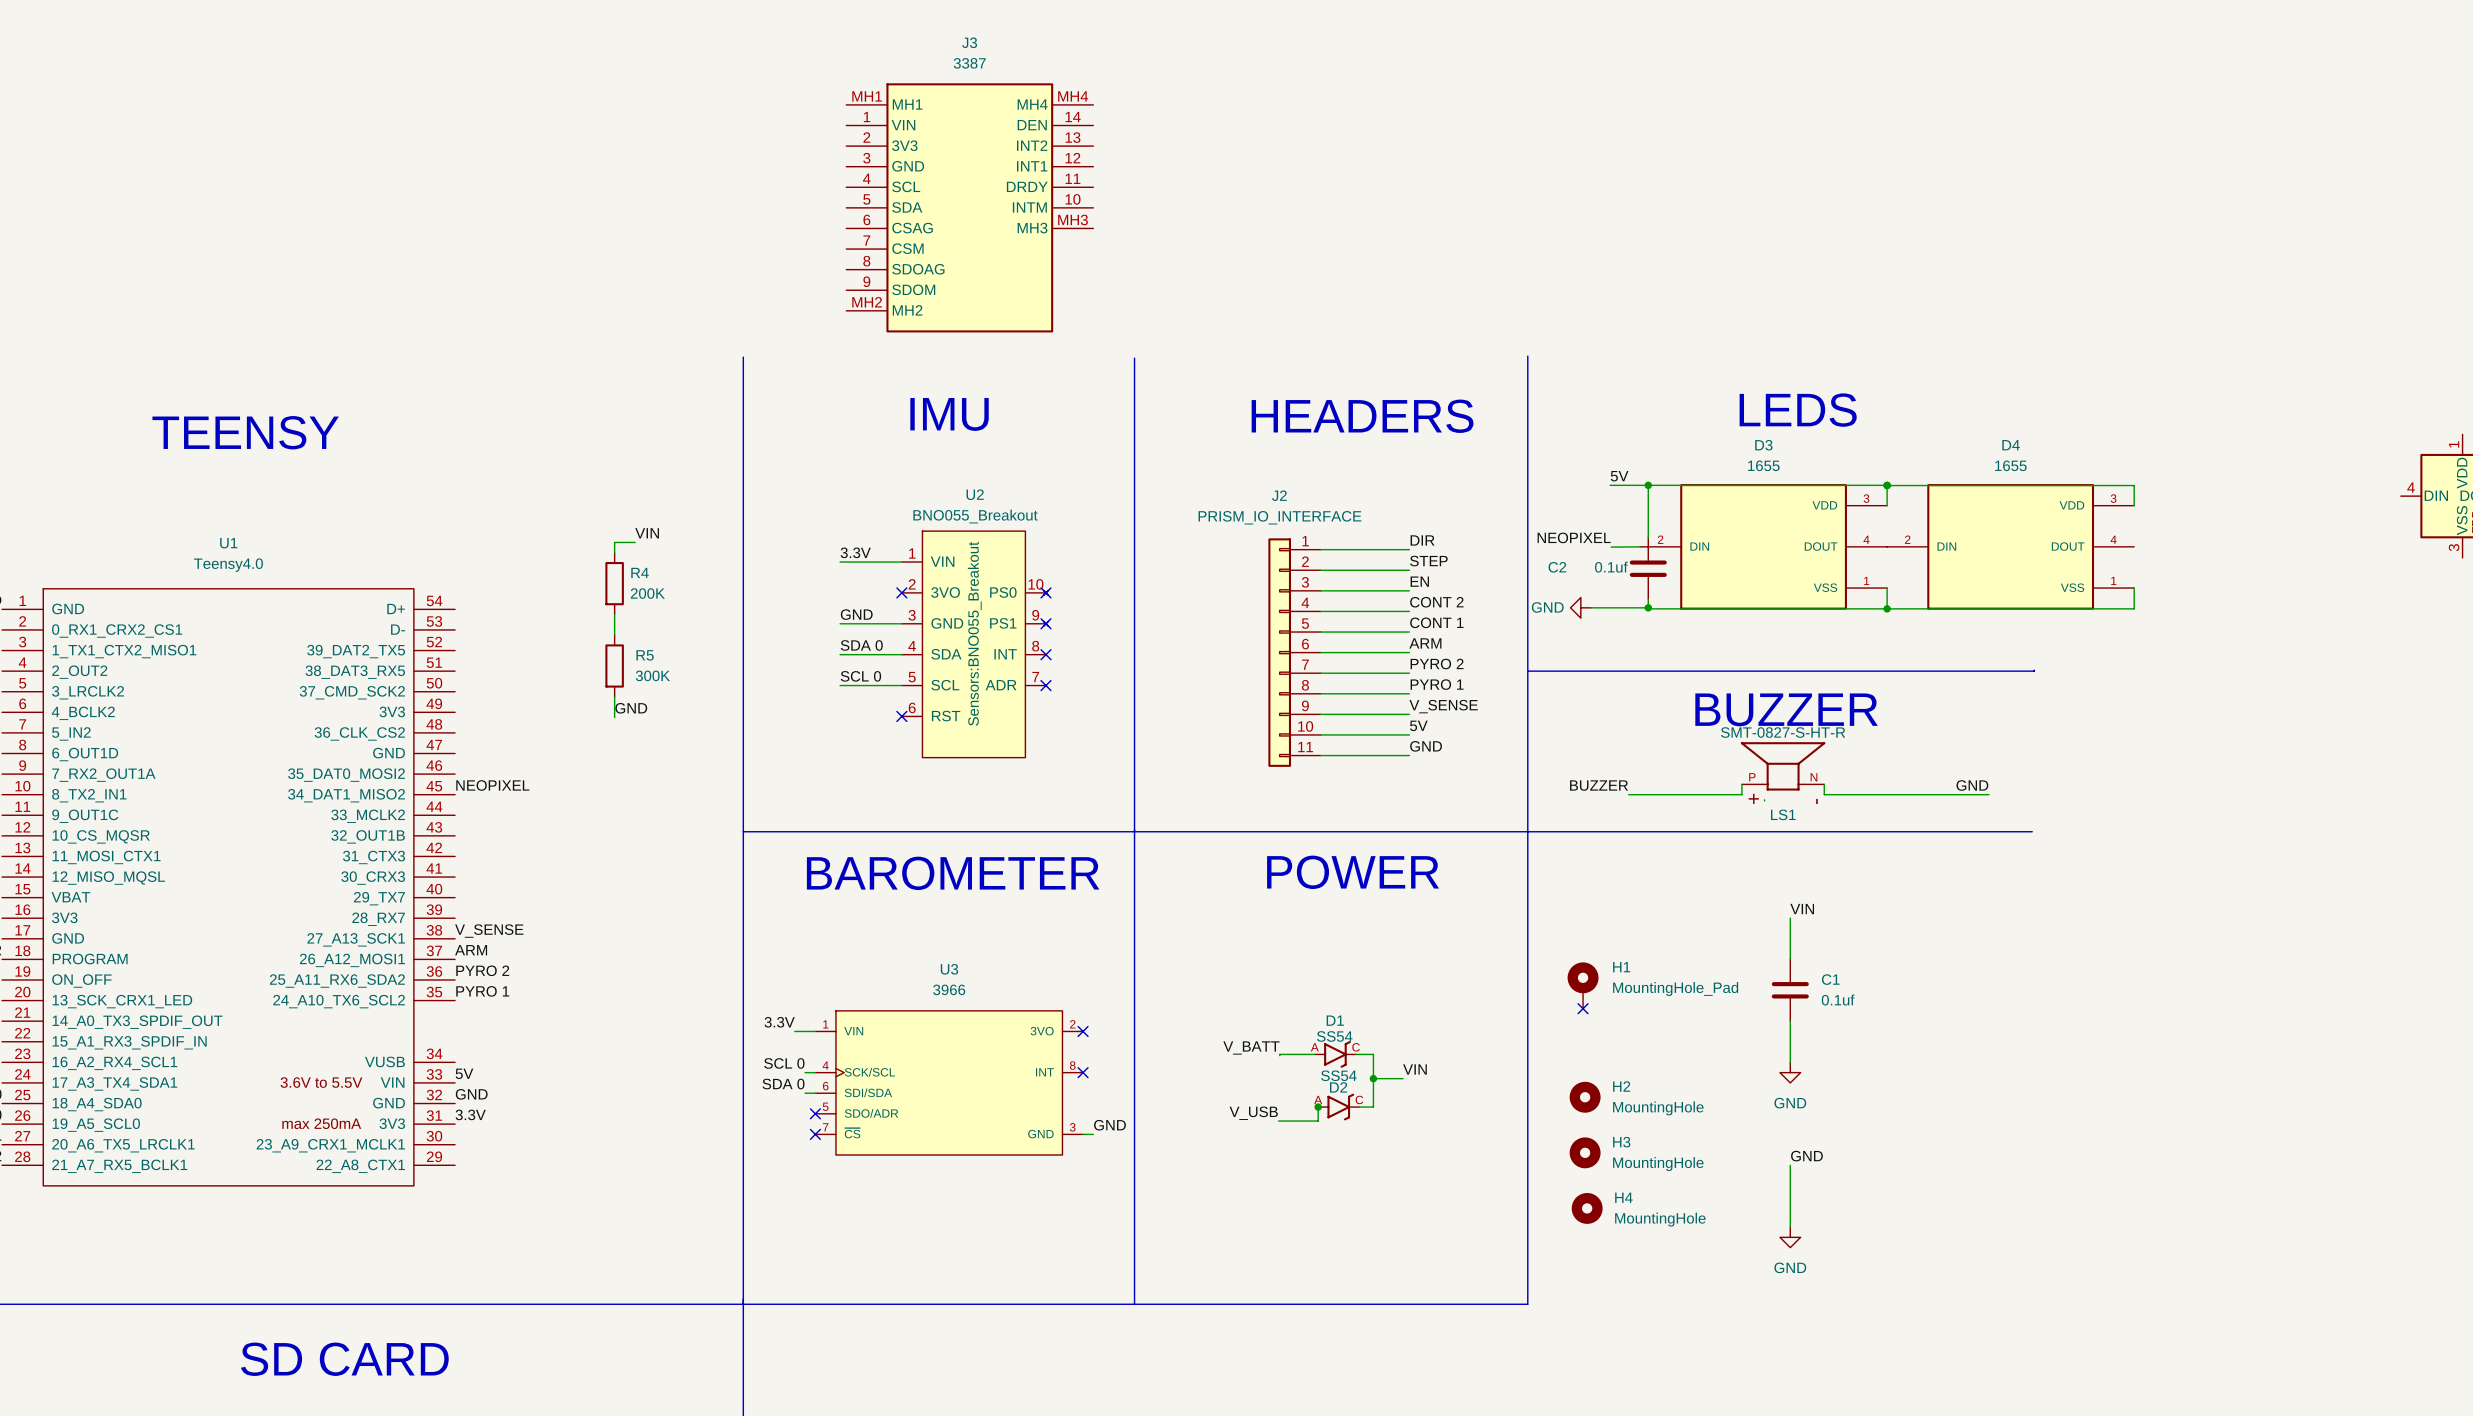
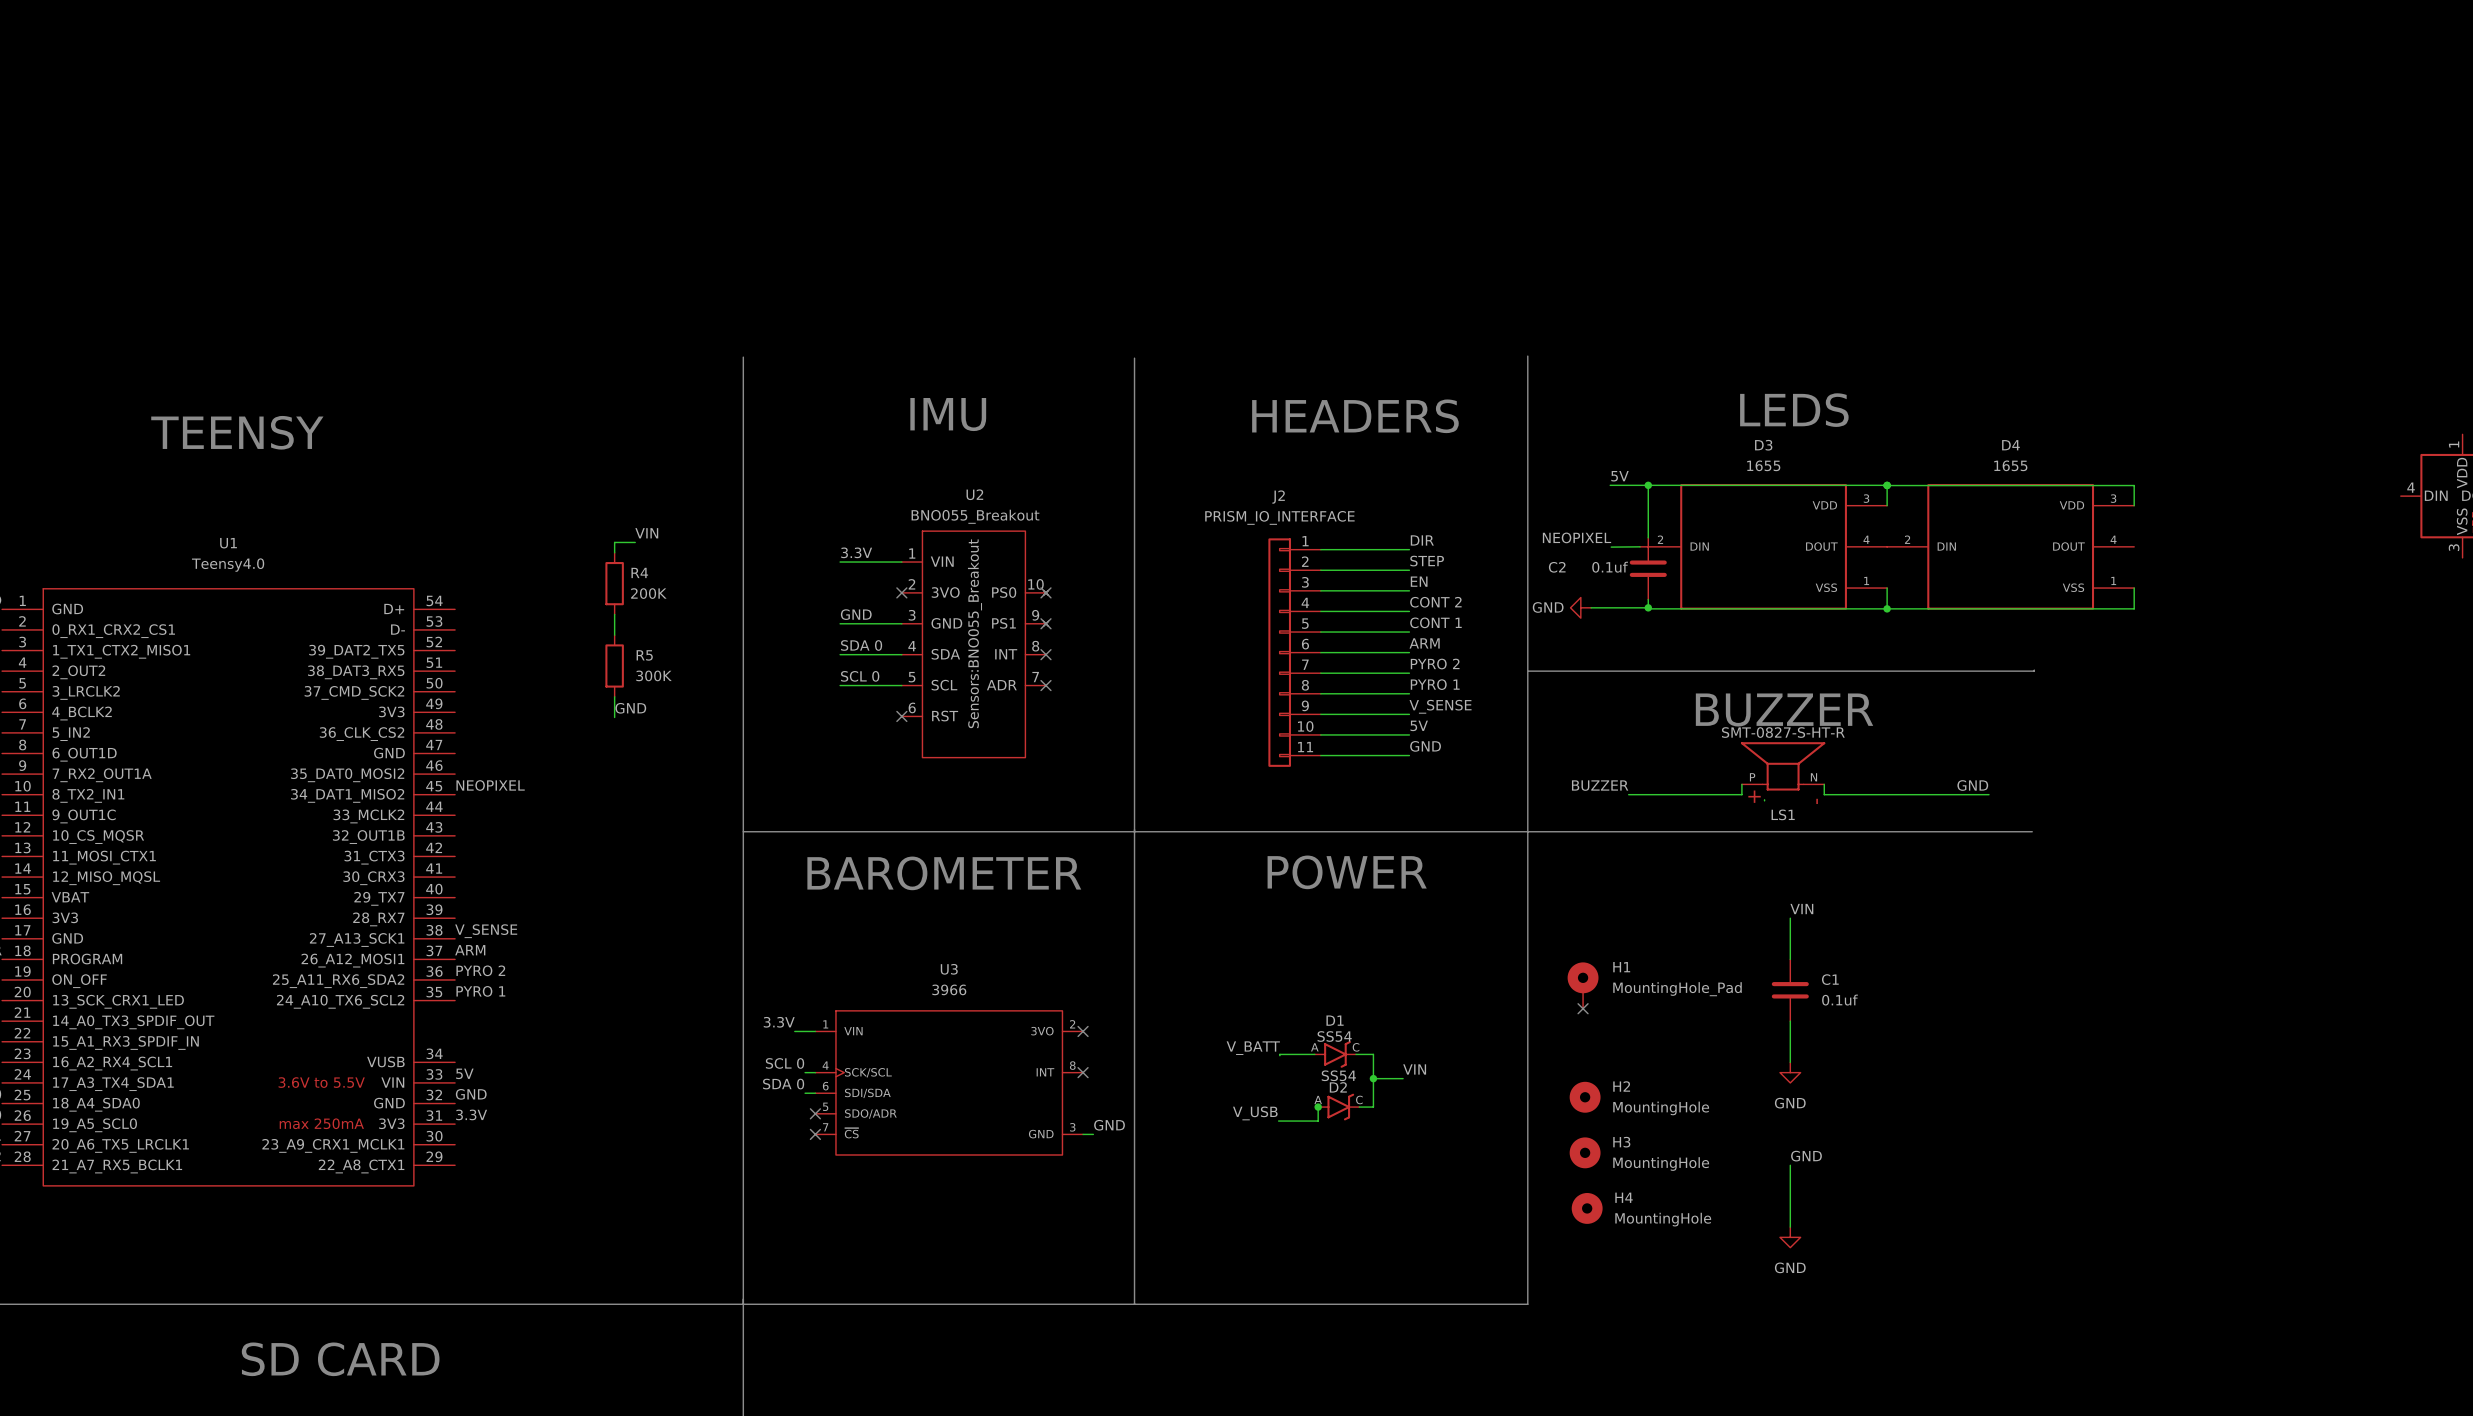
J3: 3387 (969, 207) -> none

